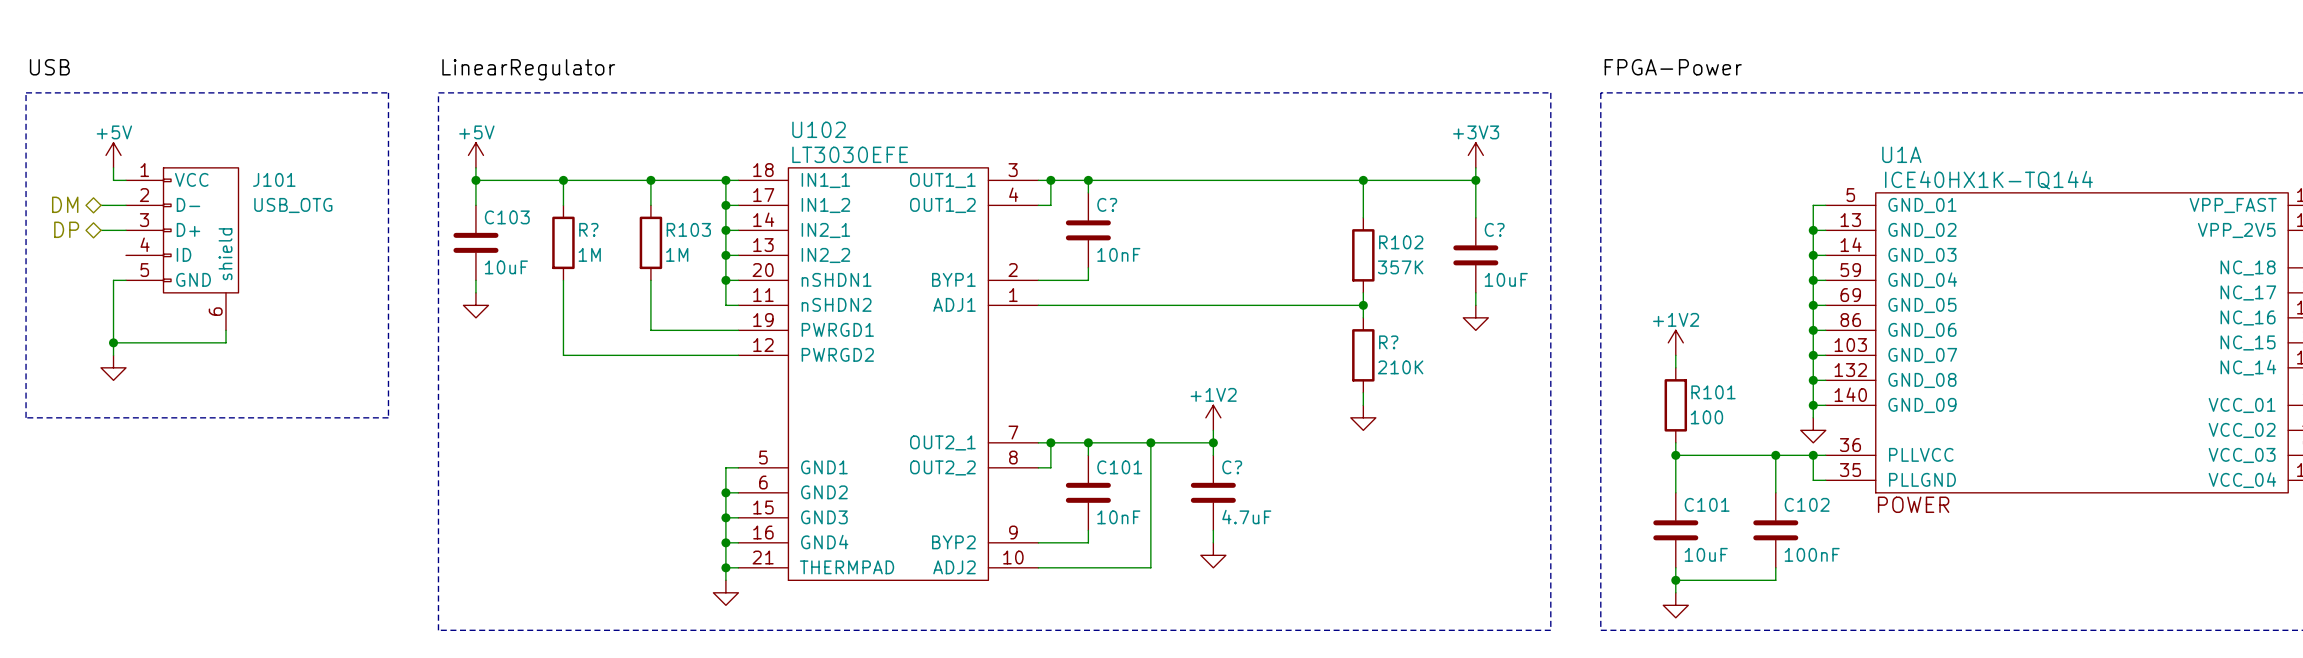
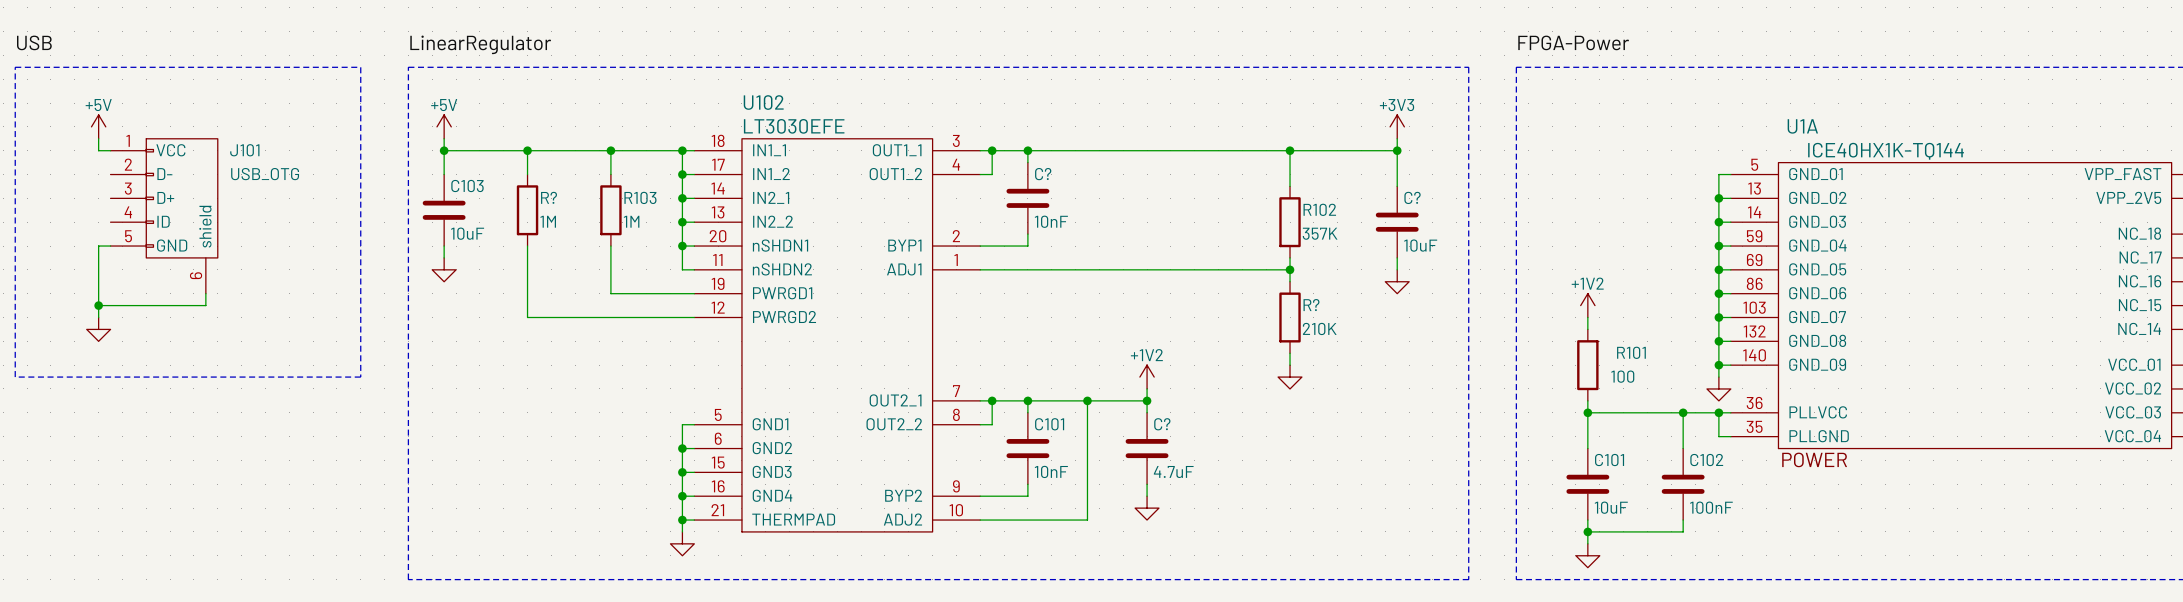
hierarchical label: DM (65, 204) -> none
wire: (101, 205) (126, 205) -> none
hierarchical label: DP (66, 229) -> none
wire: (101, 230) (126, 230) -> none

